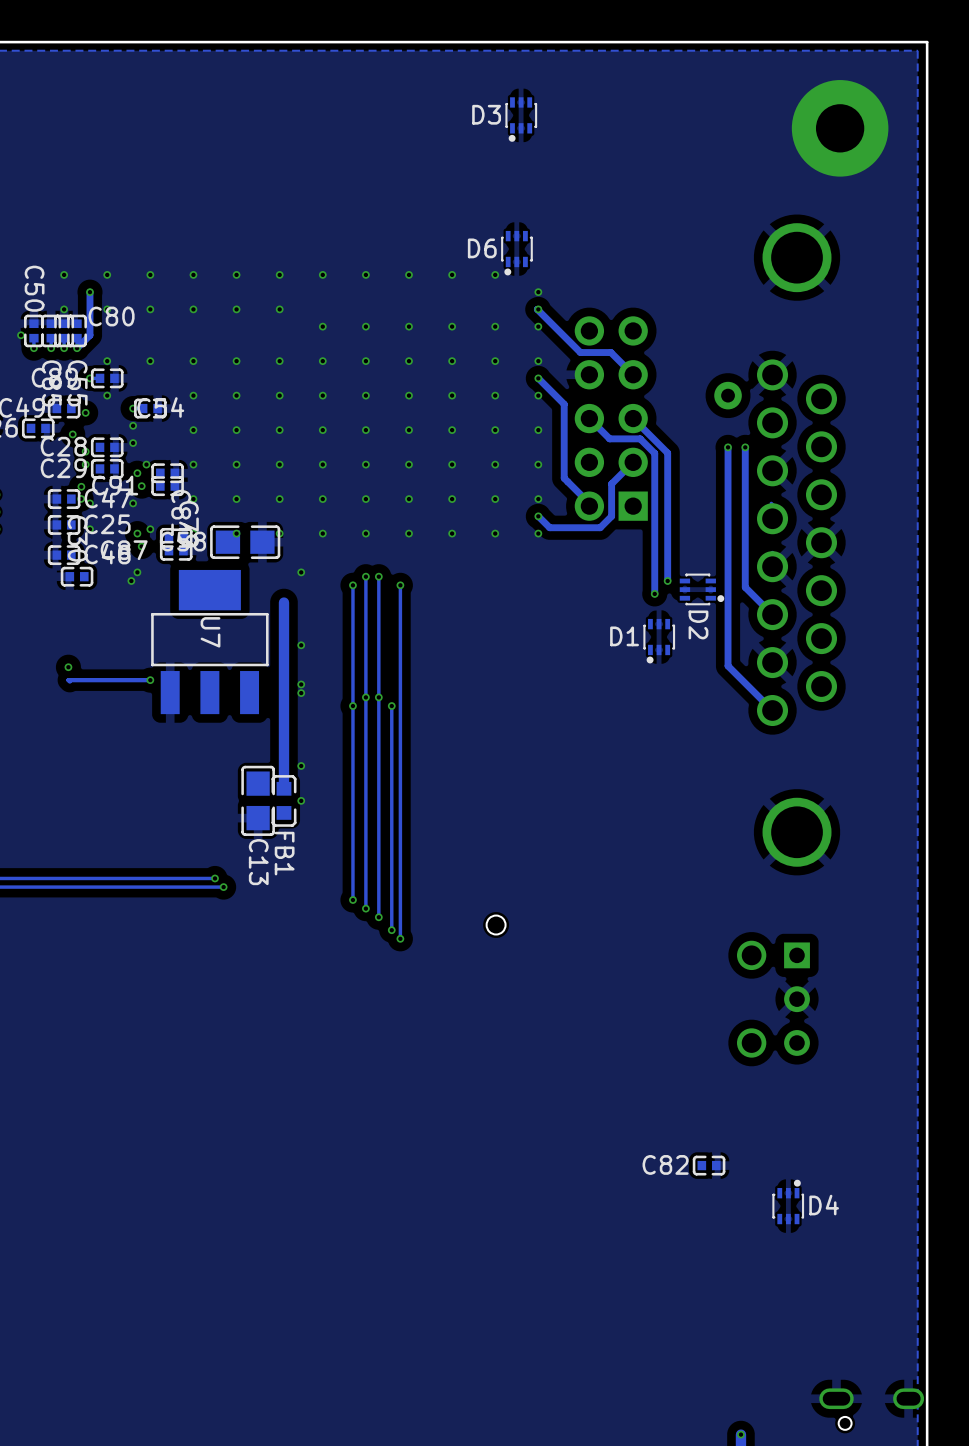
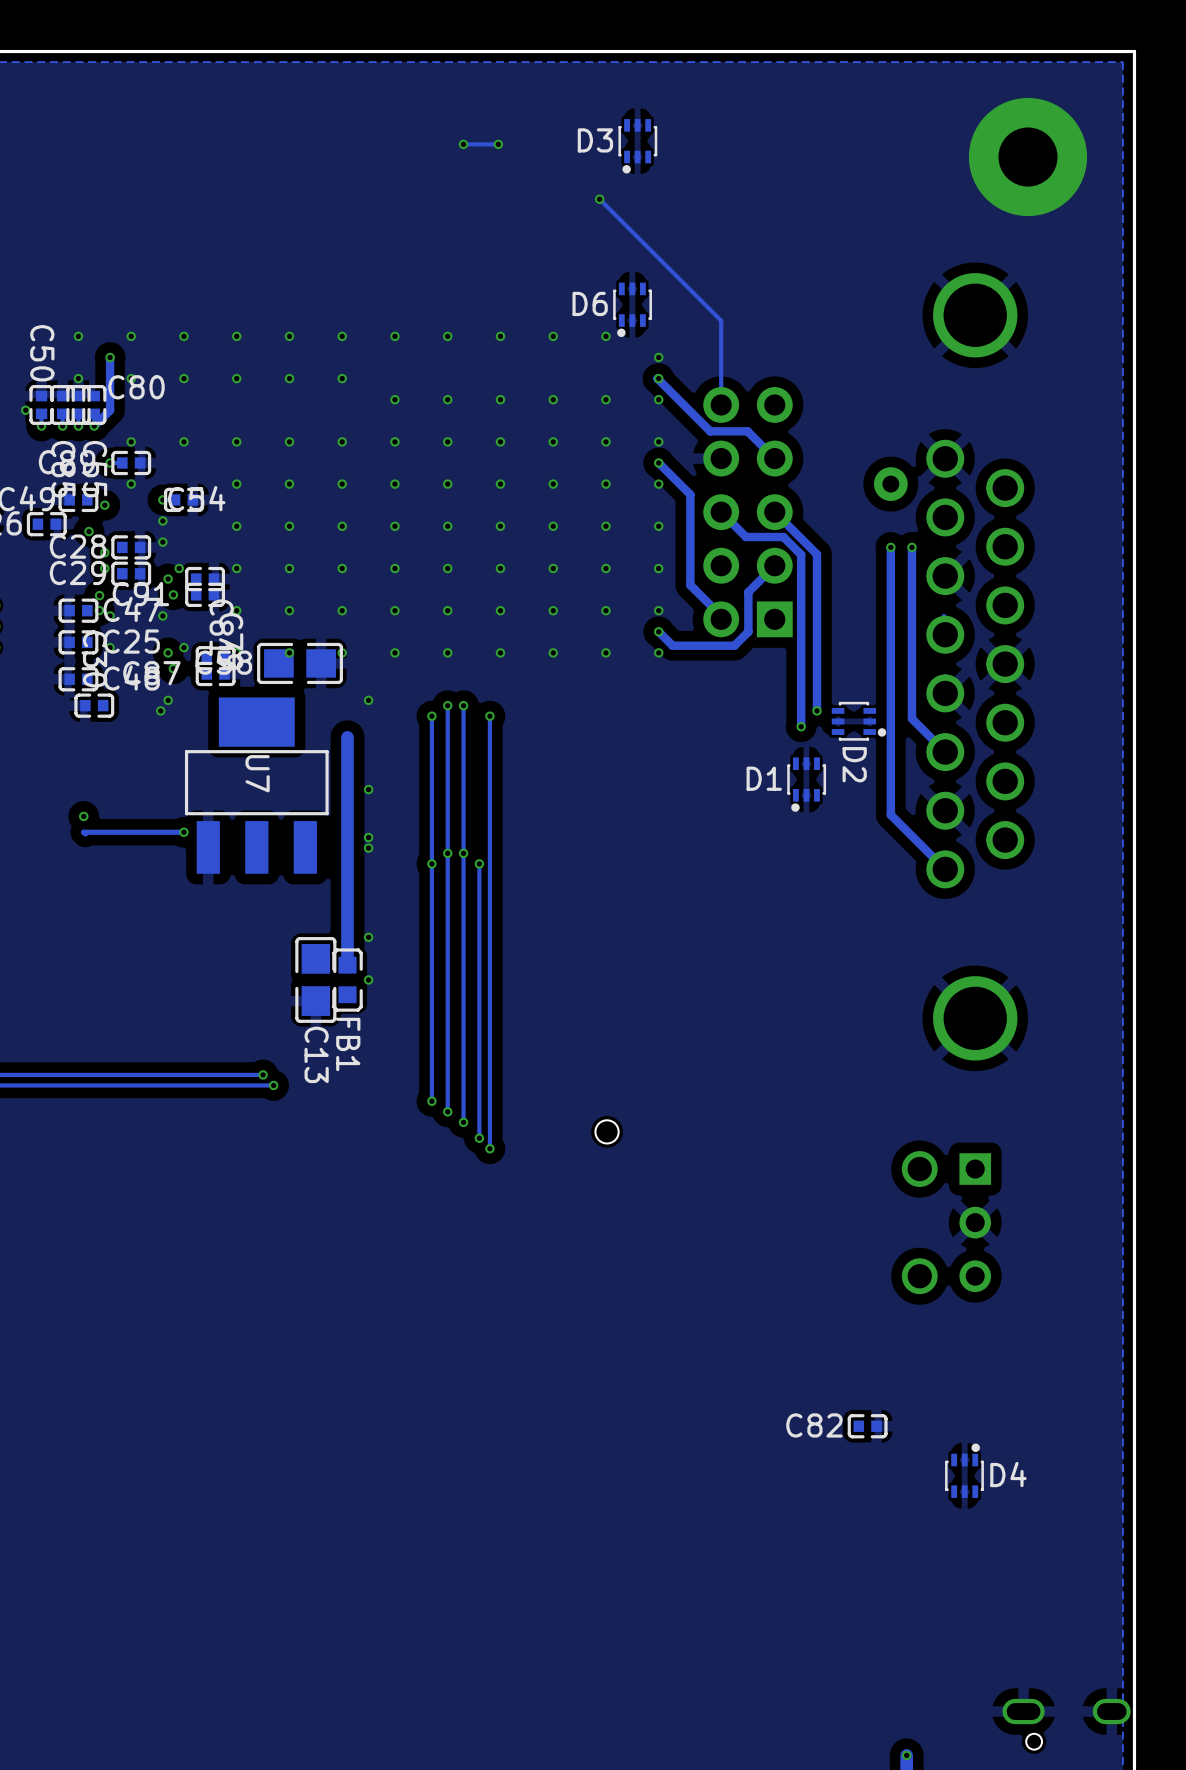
via: none -> (463, 144)
track: none -> (498, 144) (463, 144)
via: none -> (498, 144)
track: none -> (599, 199) (721, 320) (721, 404)
via: none -> (599, 199)

